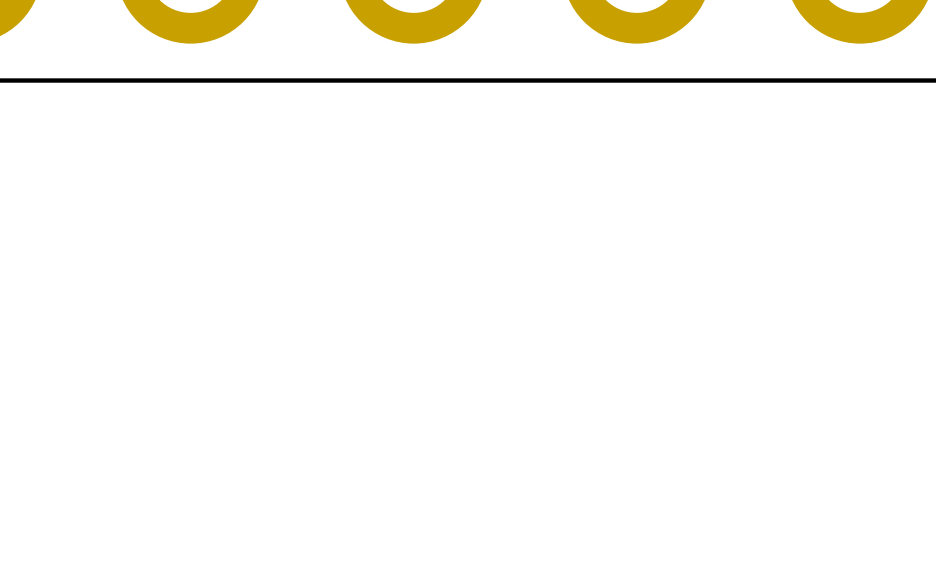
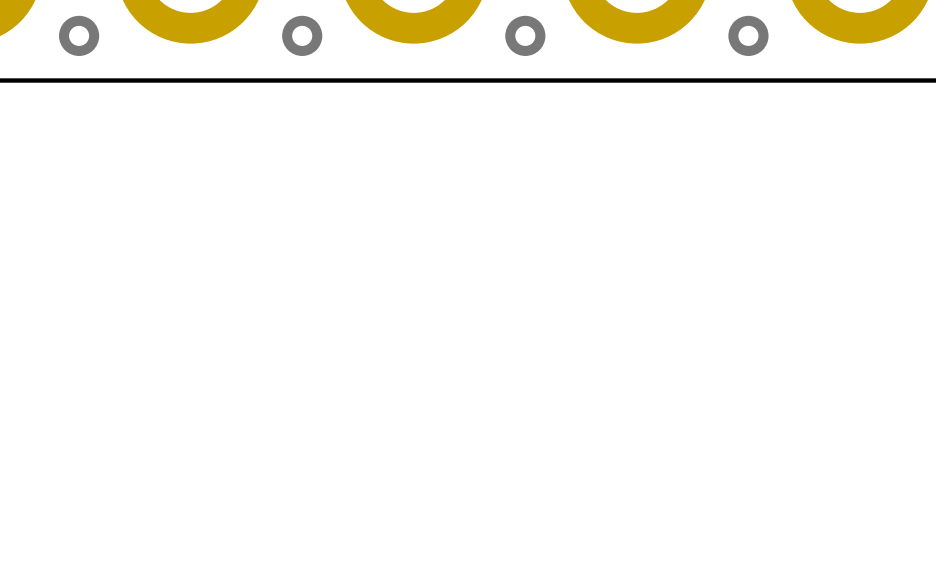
via: none -> (79, 35)
via: none -> (302, 35)
via: none -> (525, 35)
via: none -> (748, 35)

